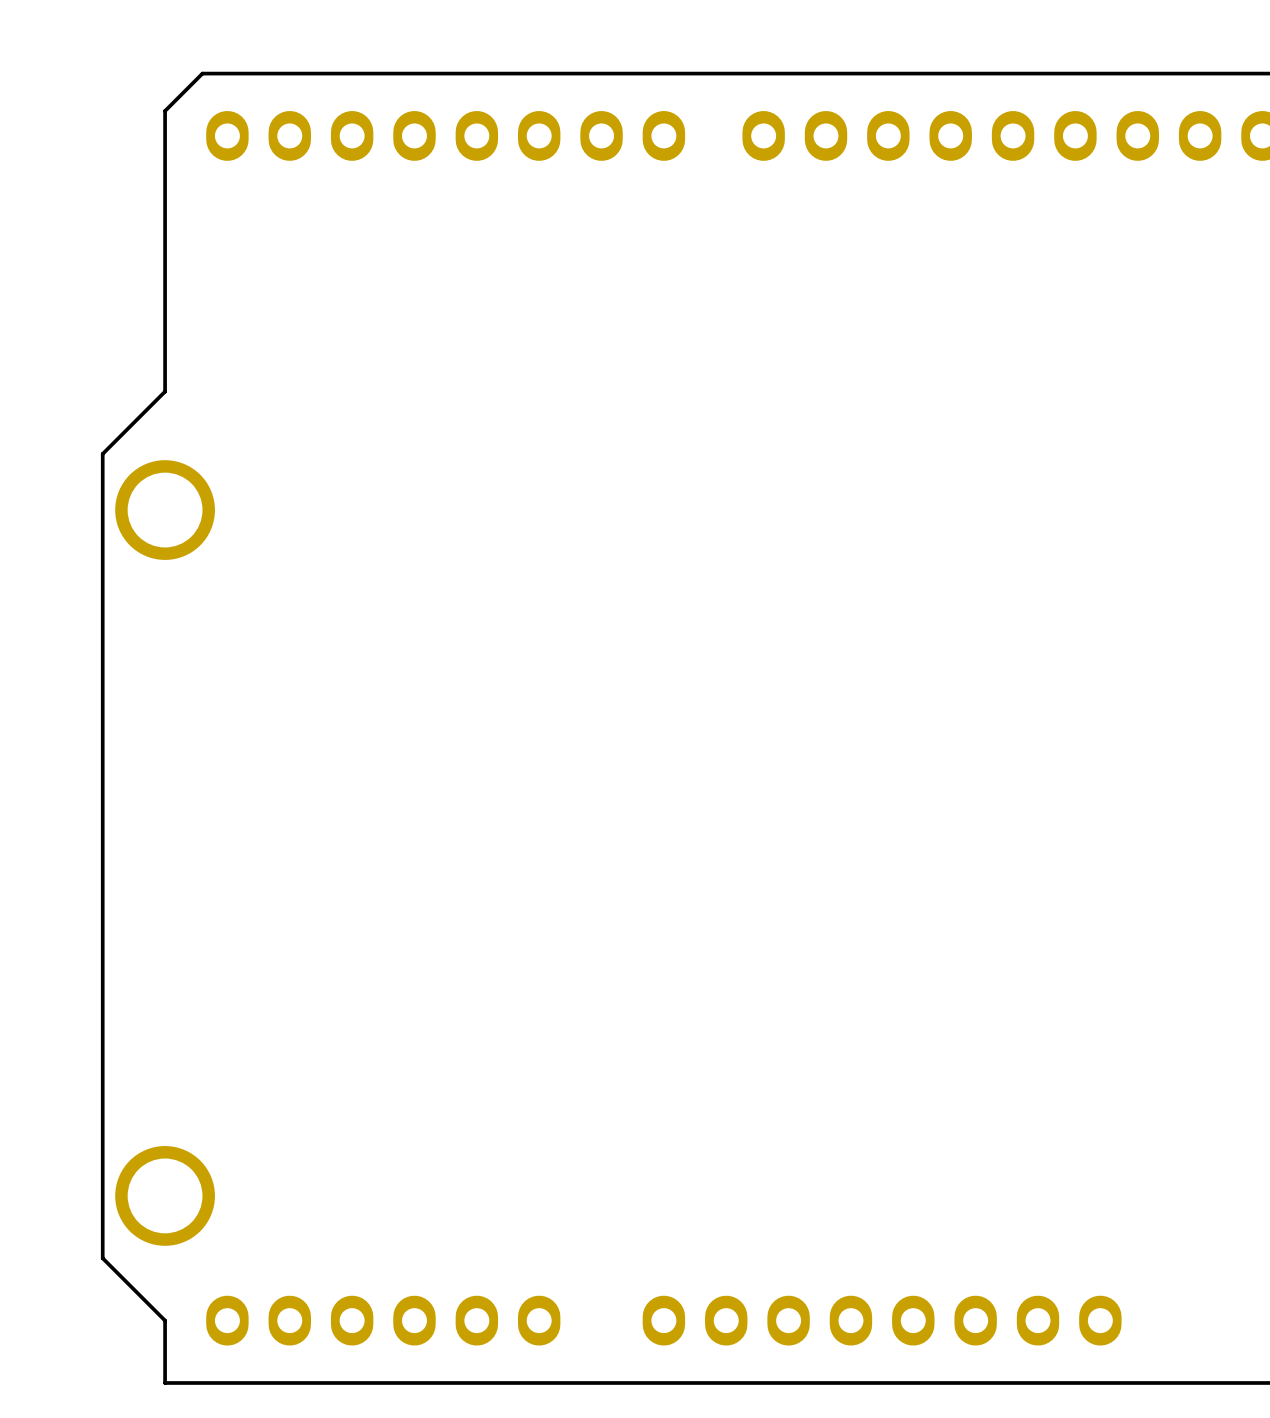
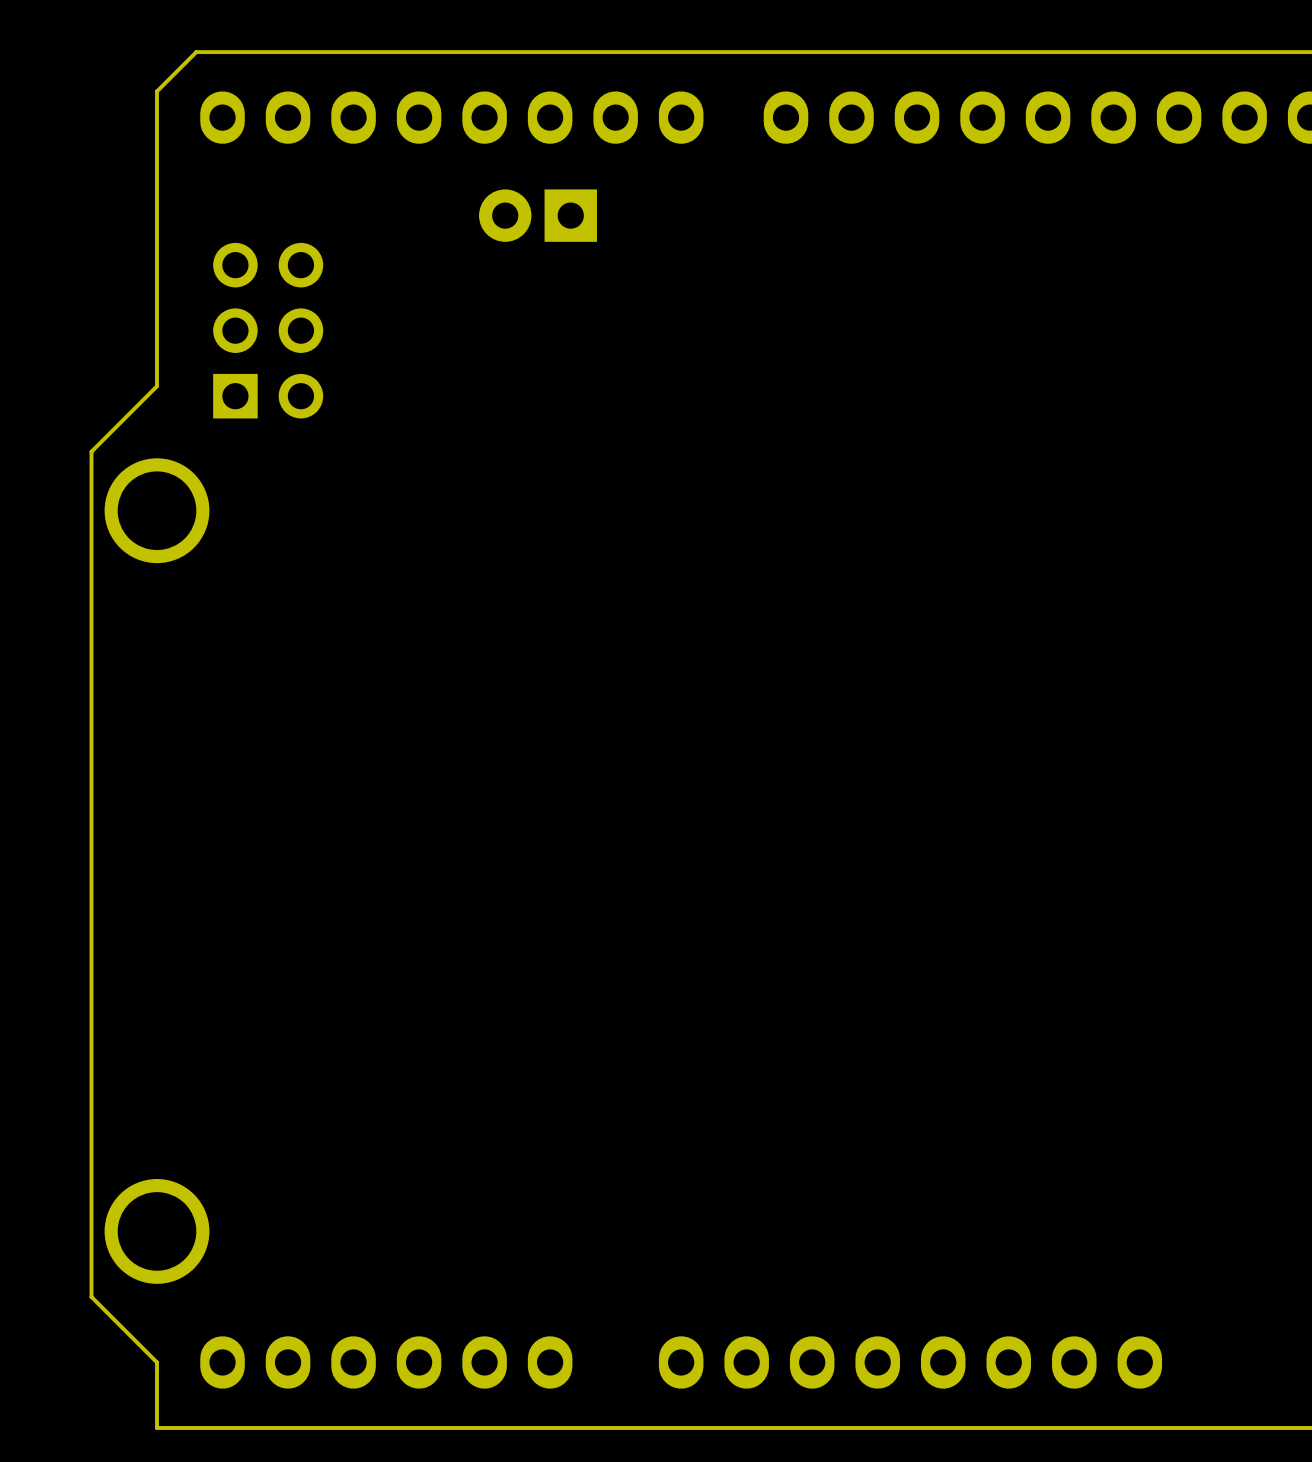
part: none -> (538, 215)
part: none -> (268, 330)

